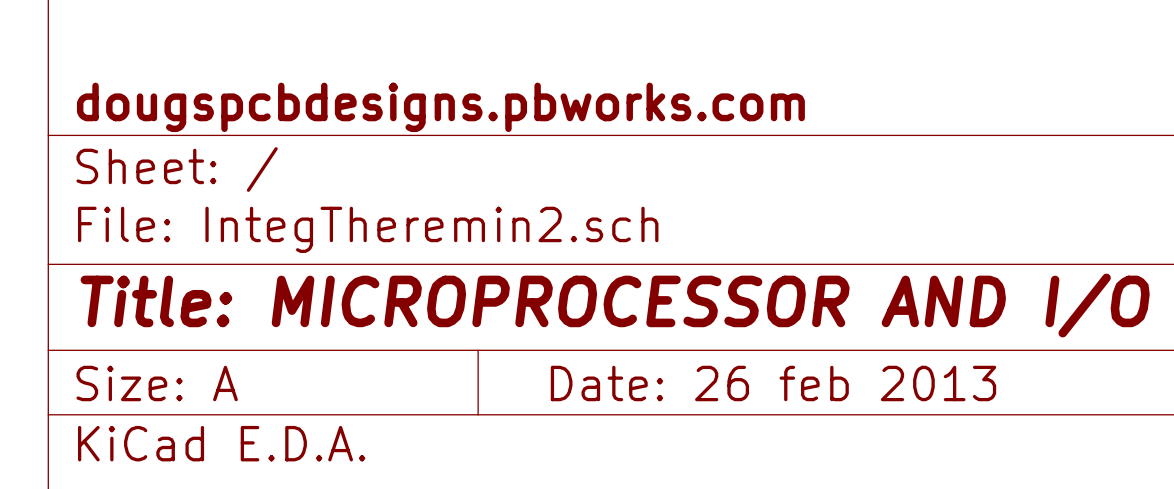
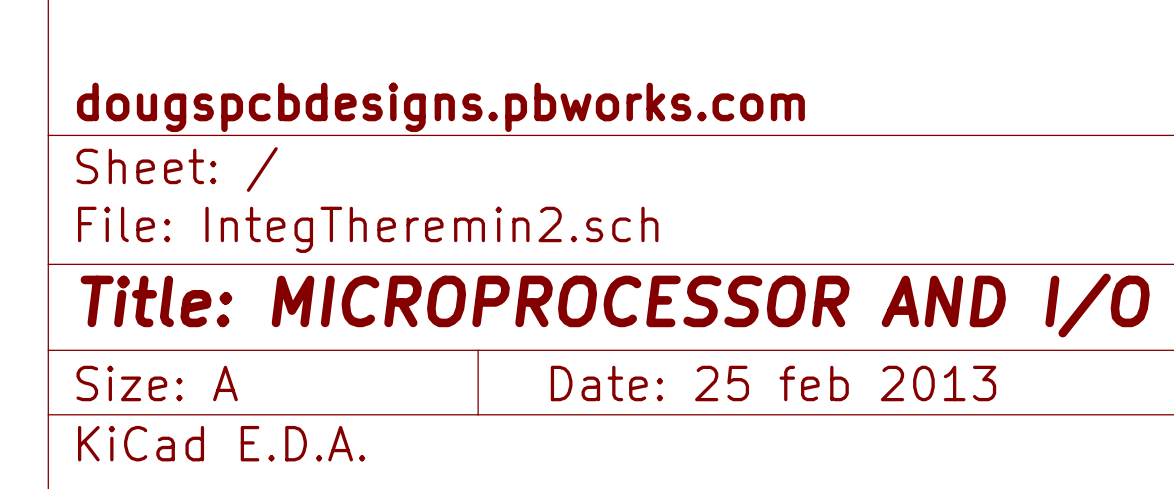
title block: Date: 26 feb 2013 (773, 383) -> Date: 25 feb 2013 (773, 383)

